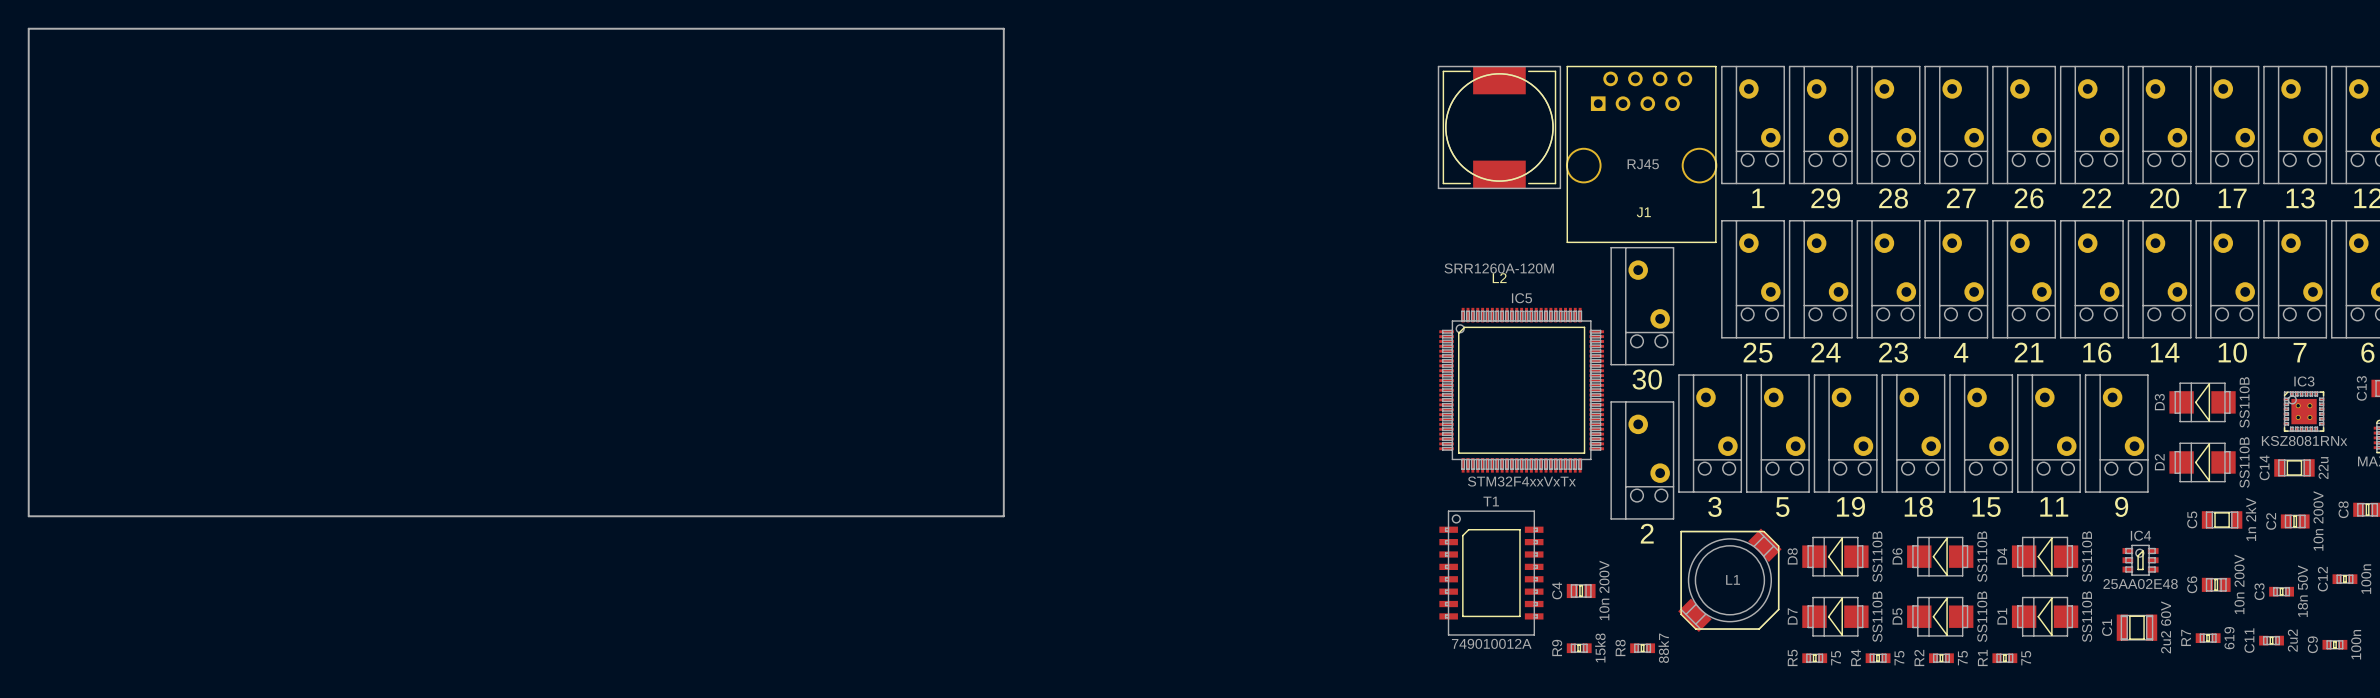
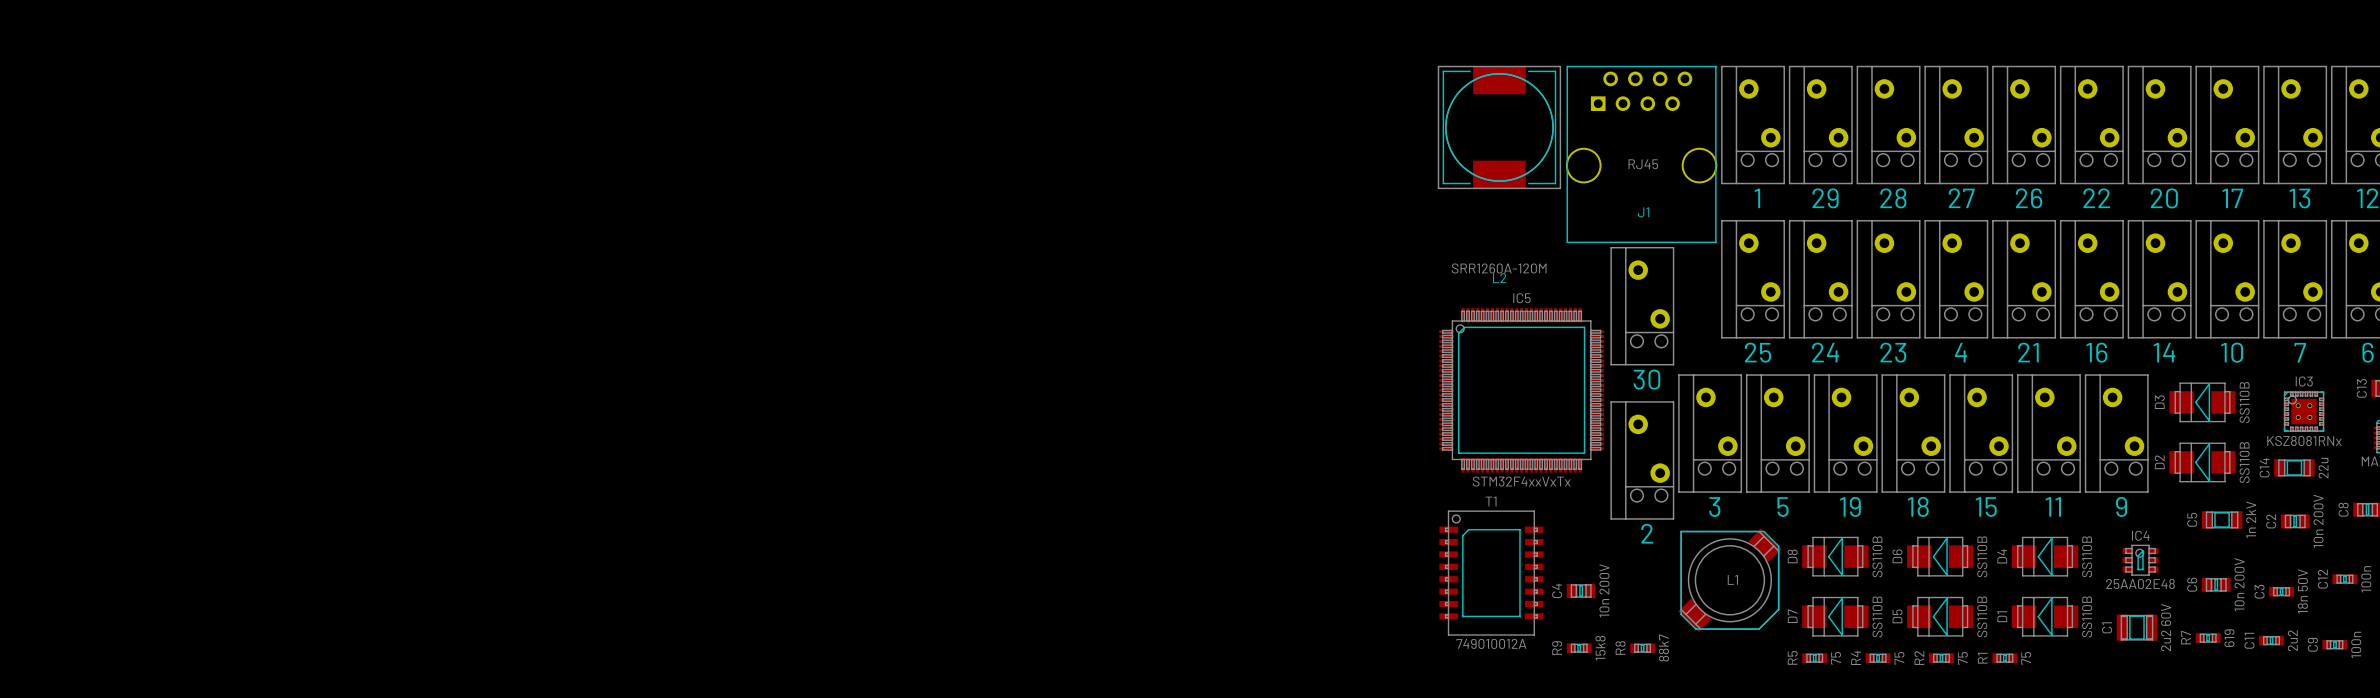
line: (28, 28) (1003, 28) (1003, 516) (28, 516) (28, 28) -> none

